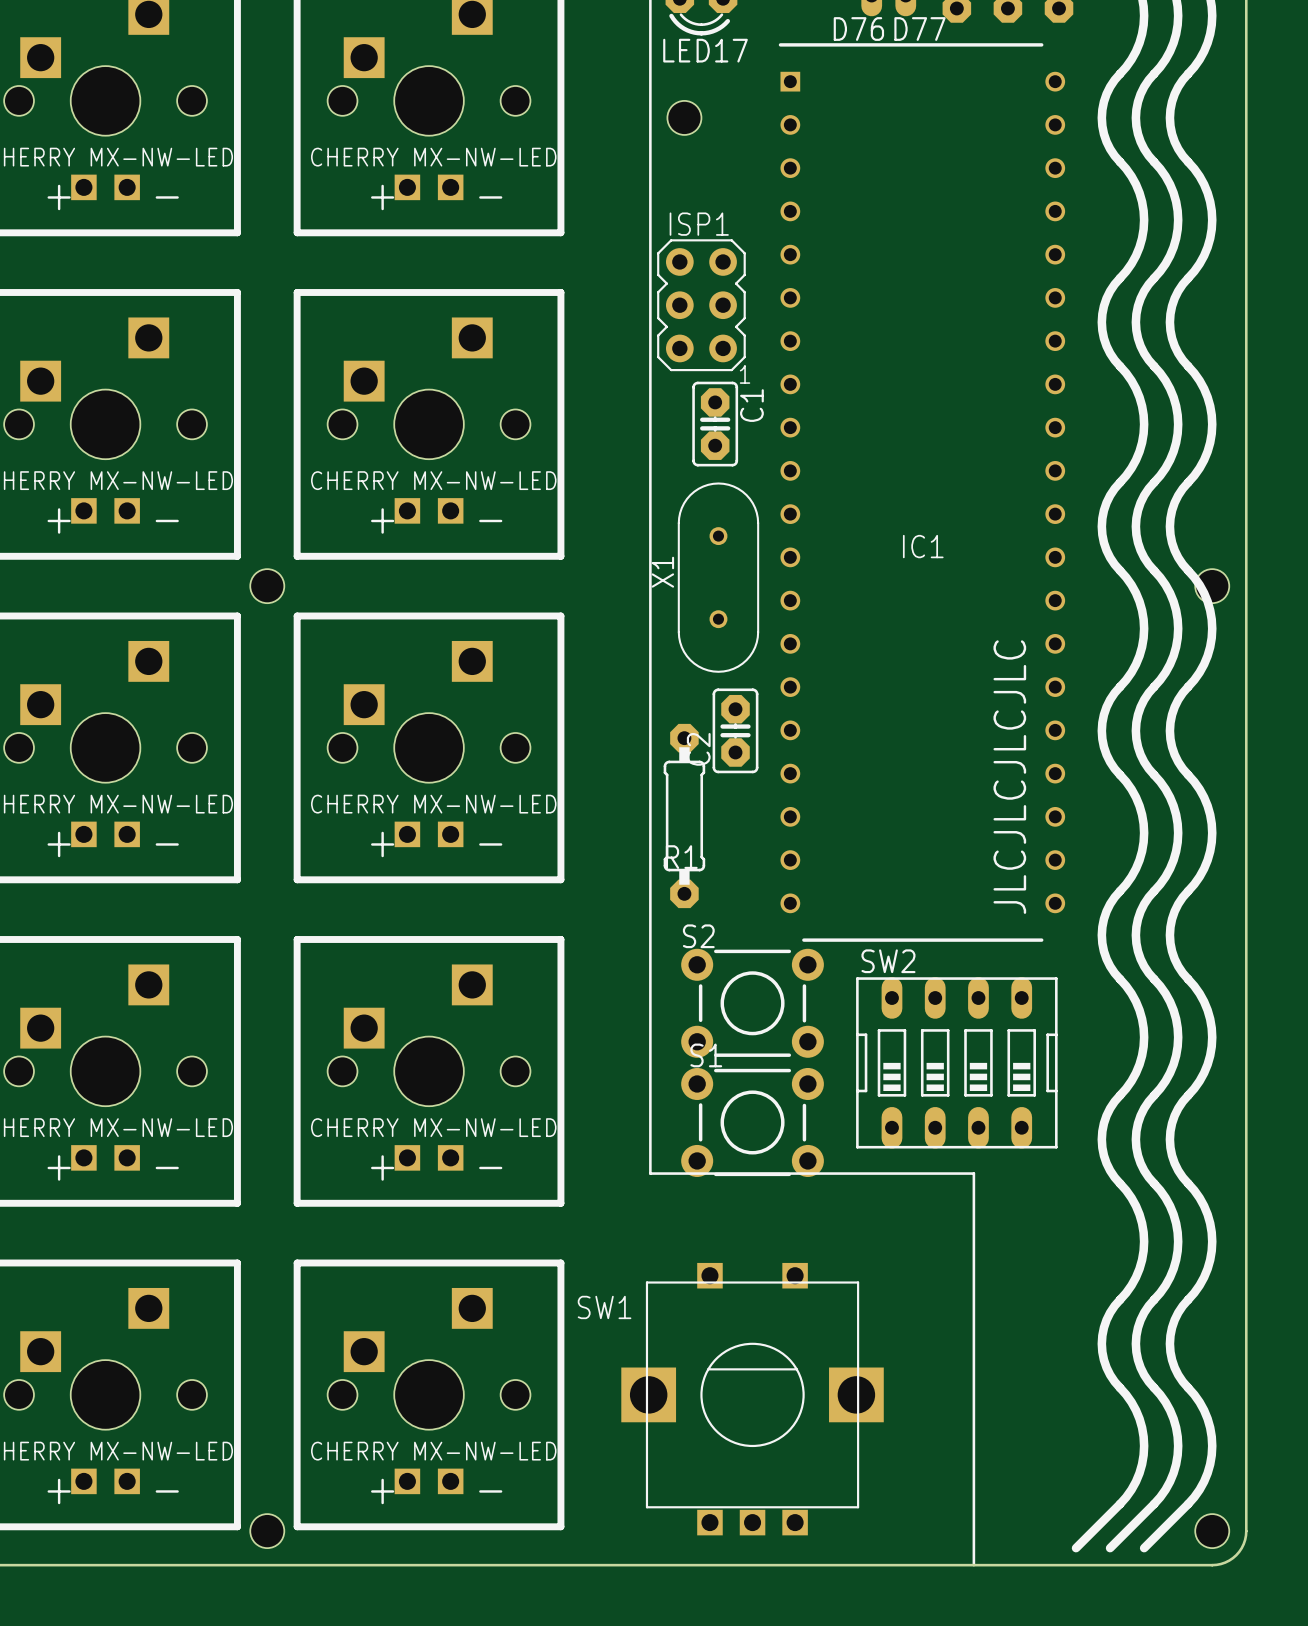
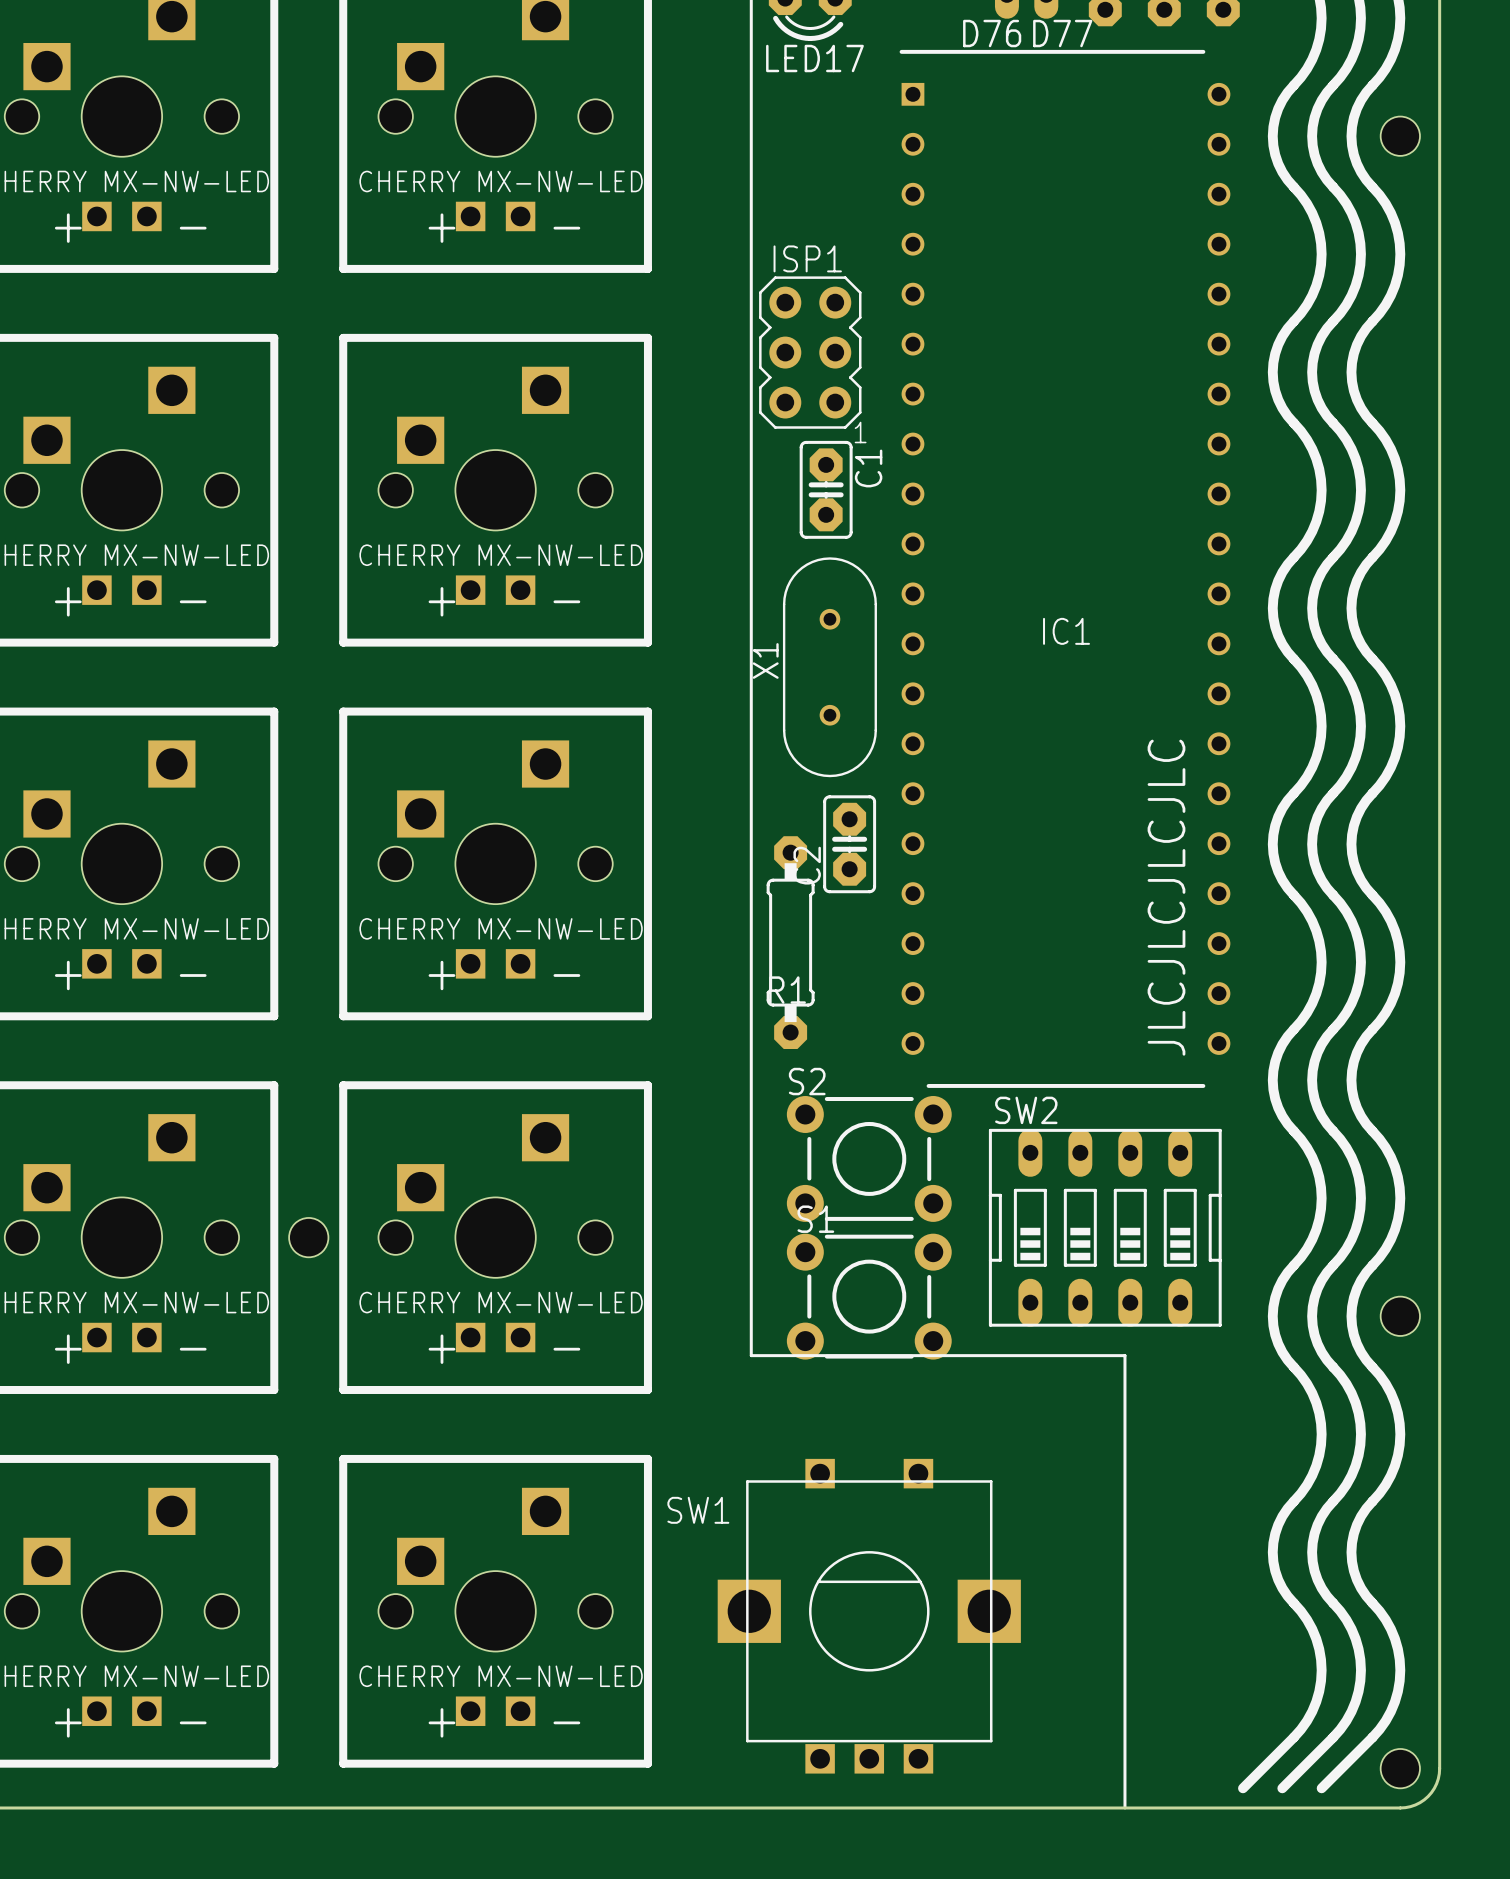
hole: (684, 117) -> none
hole: none -> (1400, 136)
hole: (267, 586) -> none
hole: (1212, 586) -> none
hole: none -> (308, 1237)
hole: none -> (1400, 1316)
hole: (267, 1531) -> none

